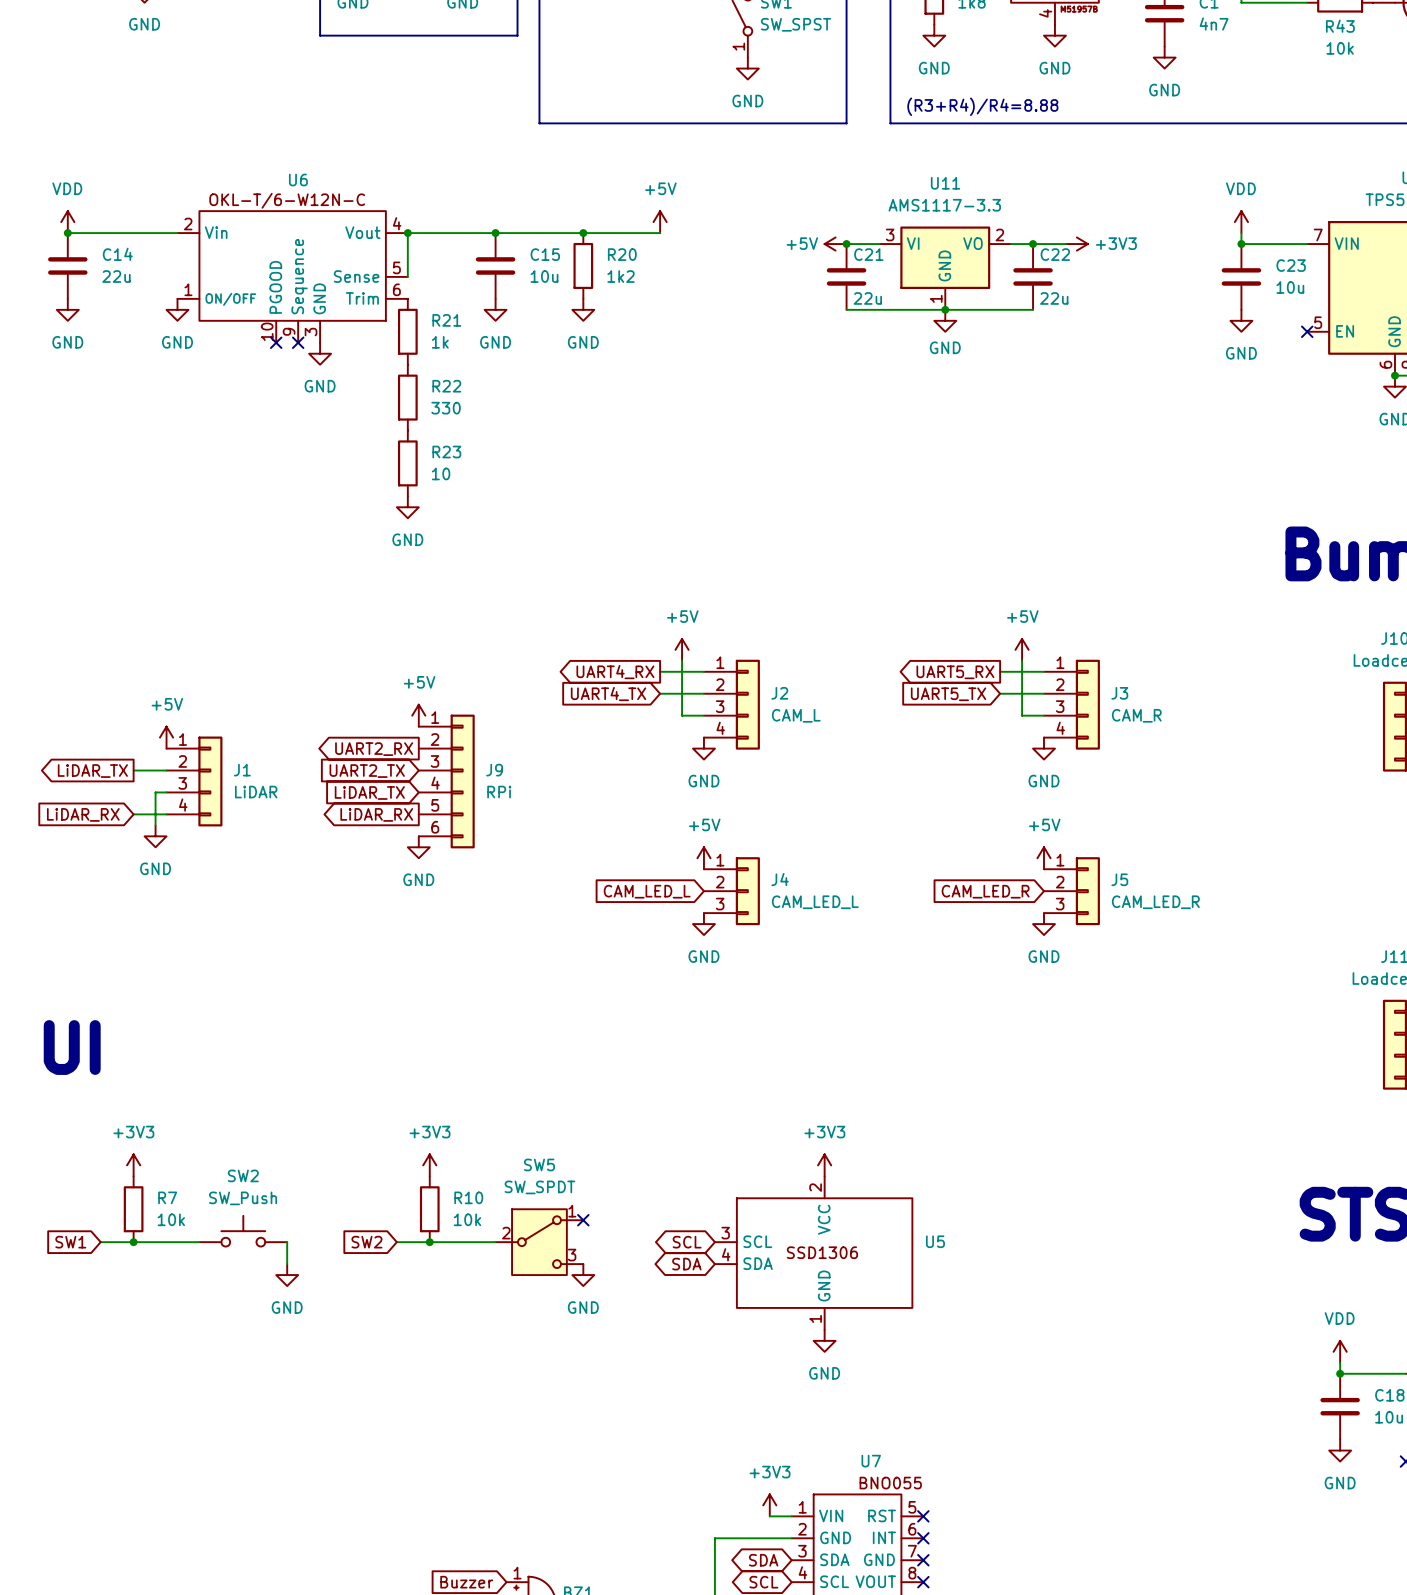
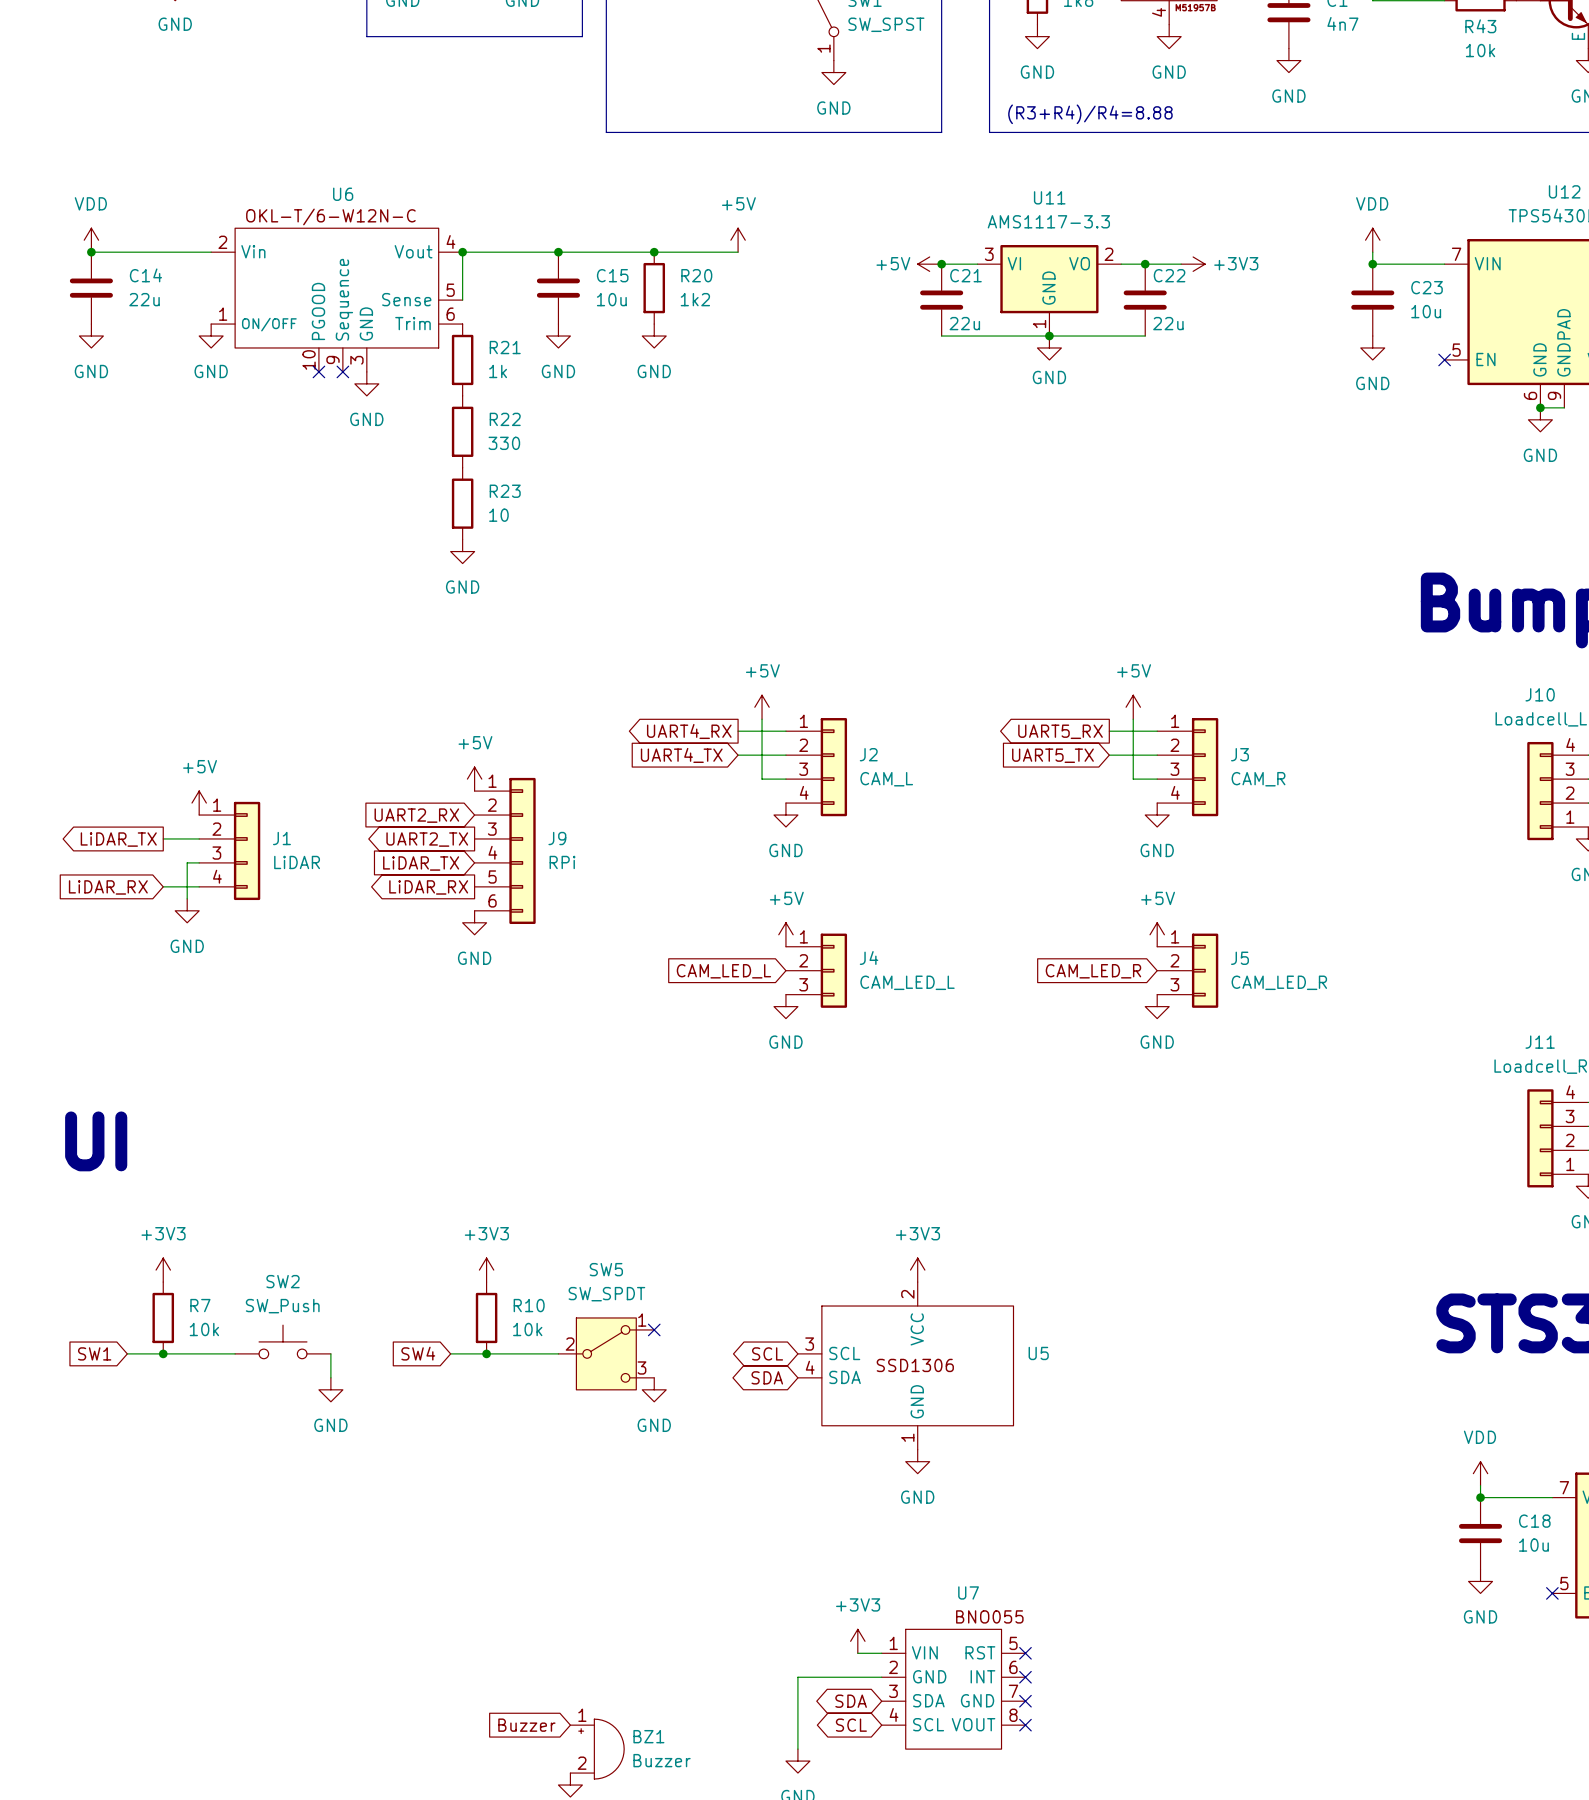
global label shape: output (374, 749) -> input (416, 815)
global label shape: input (367, 771) -> output (427, 839)
global label: SW2 (366, 1242) -> SW4 (418, 1353)

